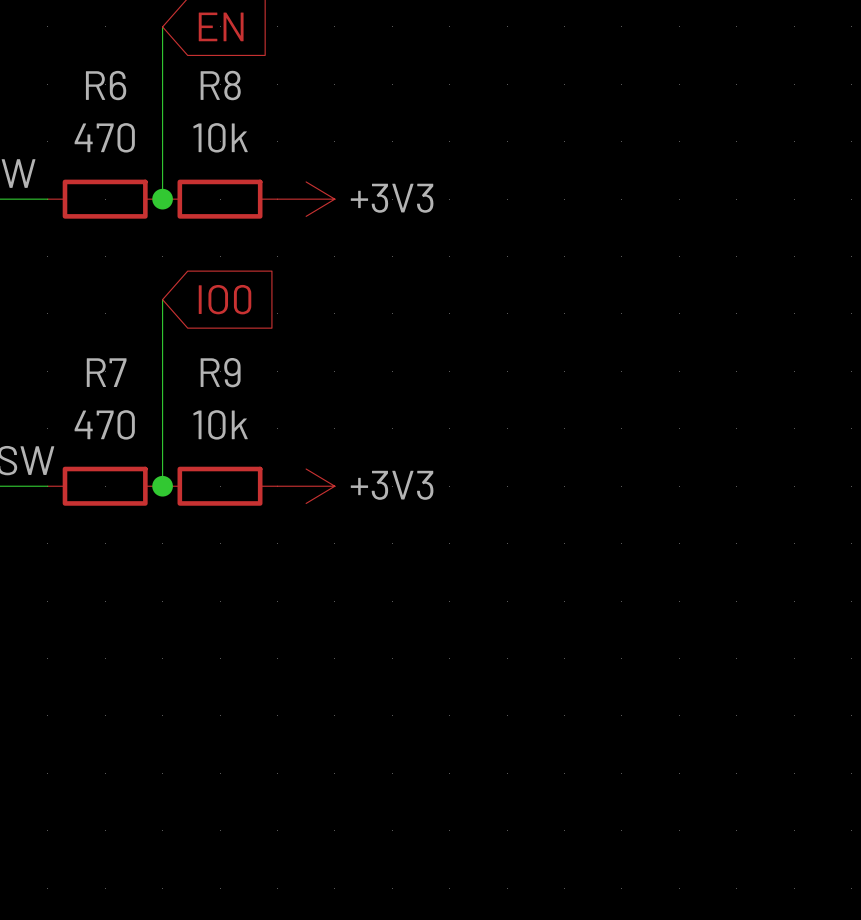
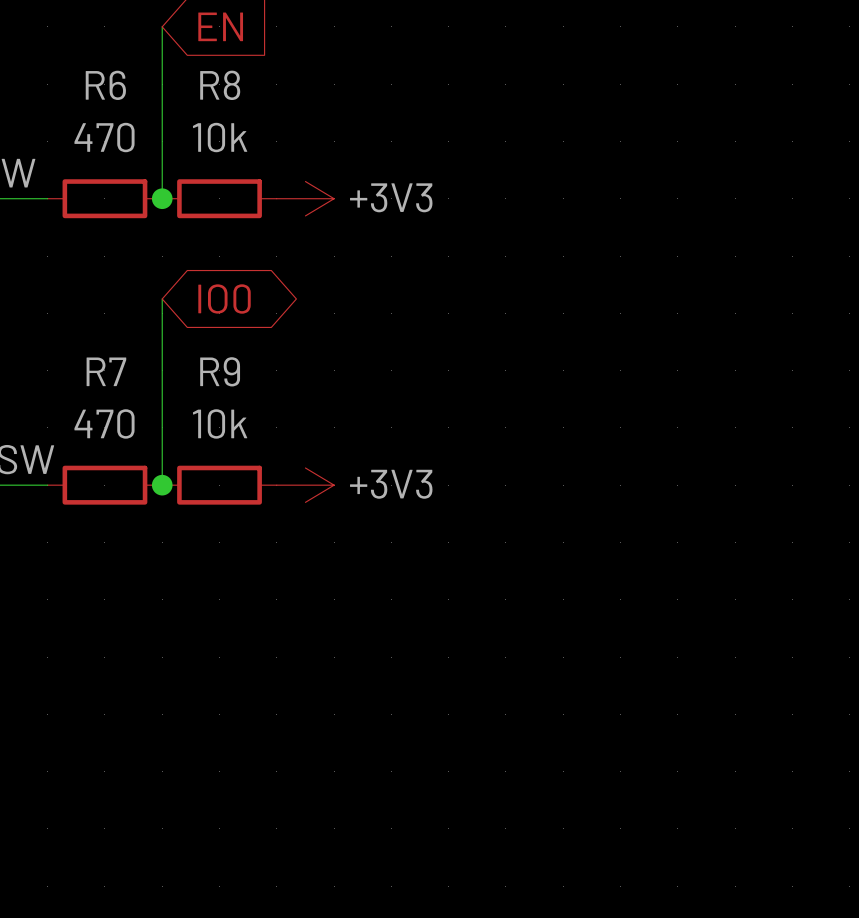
global label shape: input (225, 299) -> bidirectional (224, 299)

